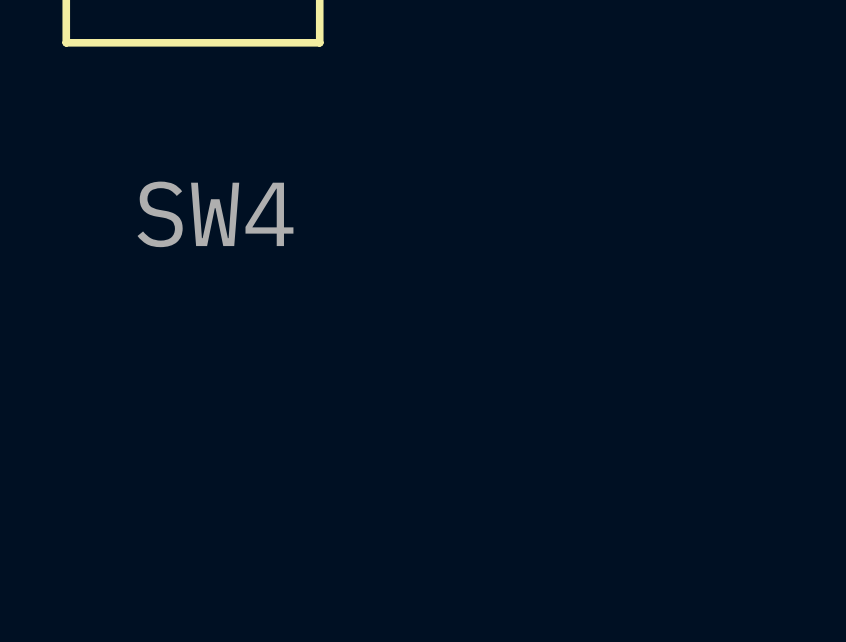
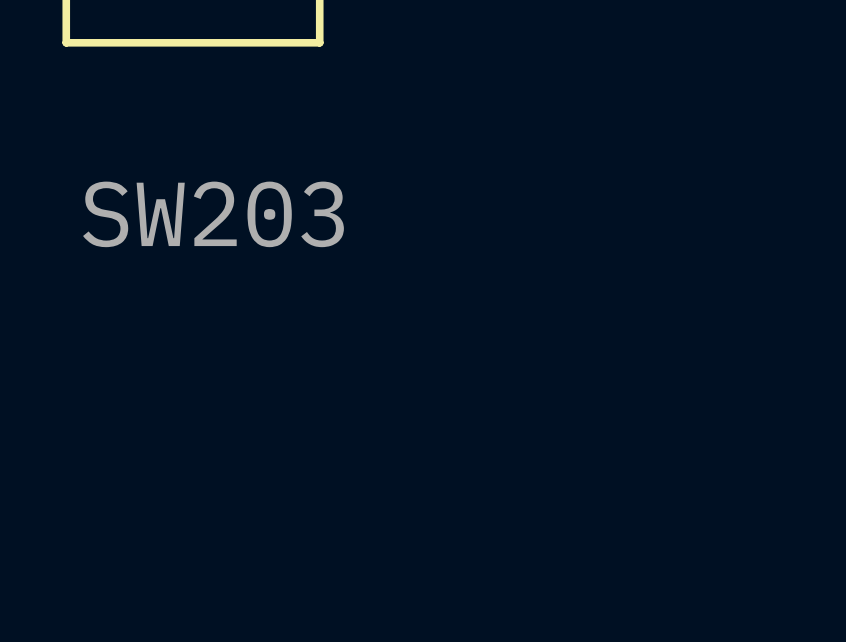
SW4 name: SW4 (215, 214) -> SW203 (213, 214)

